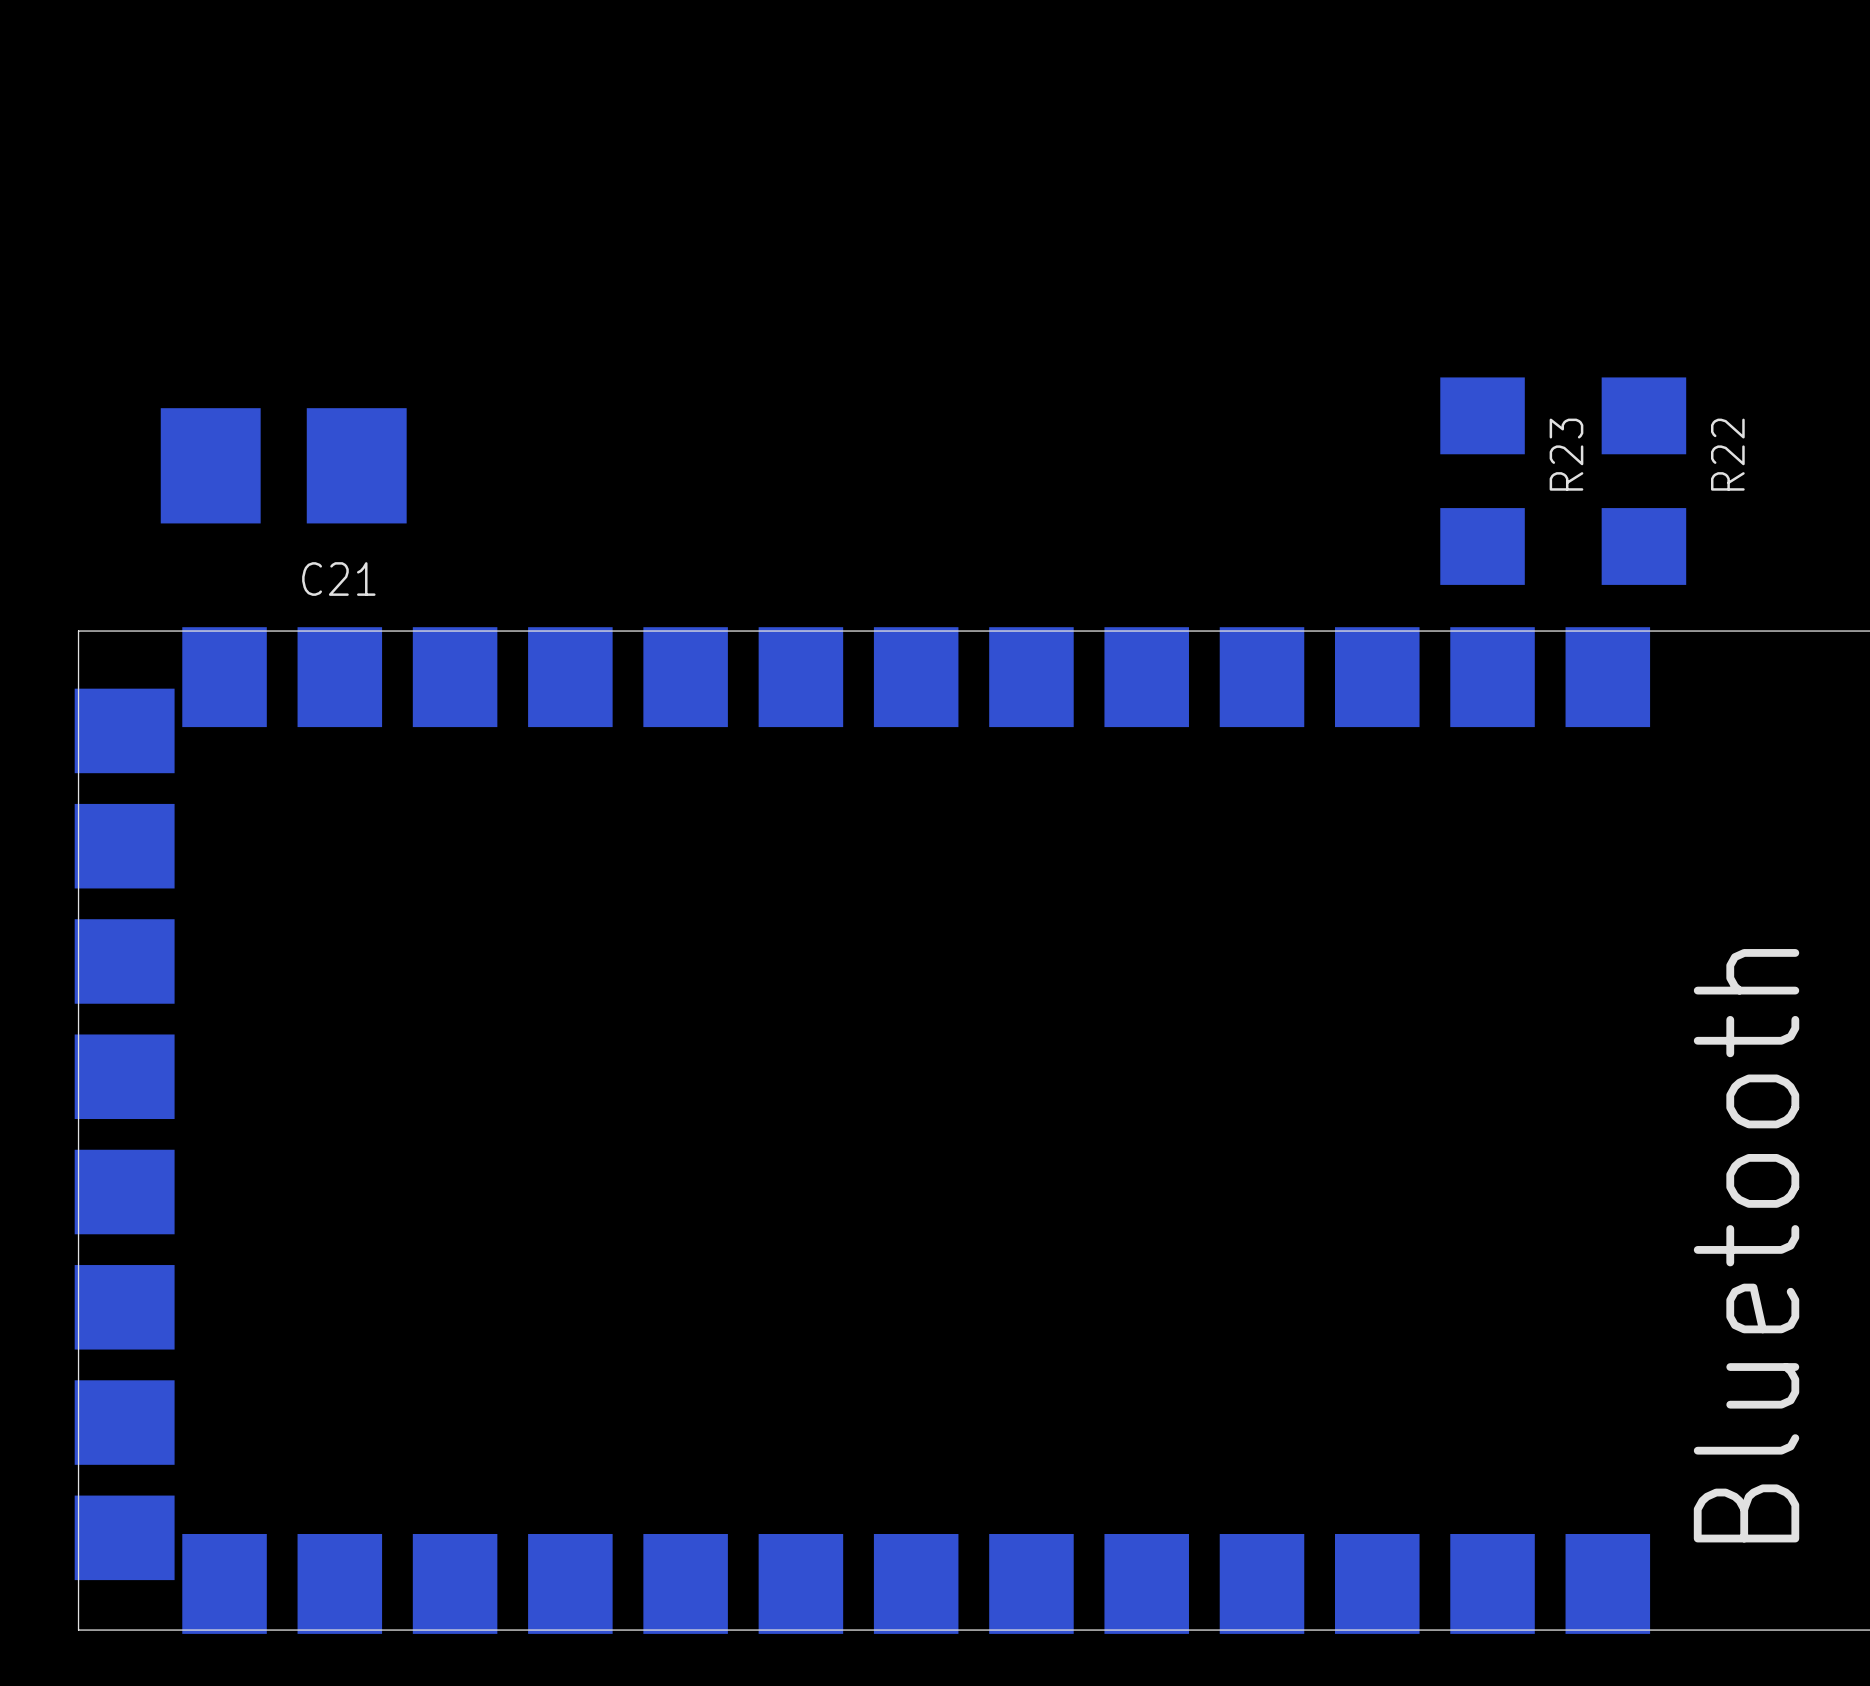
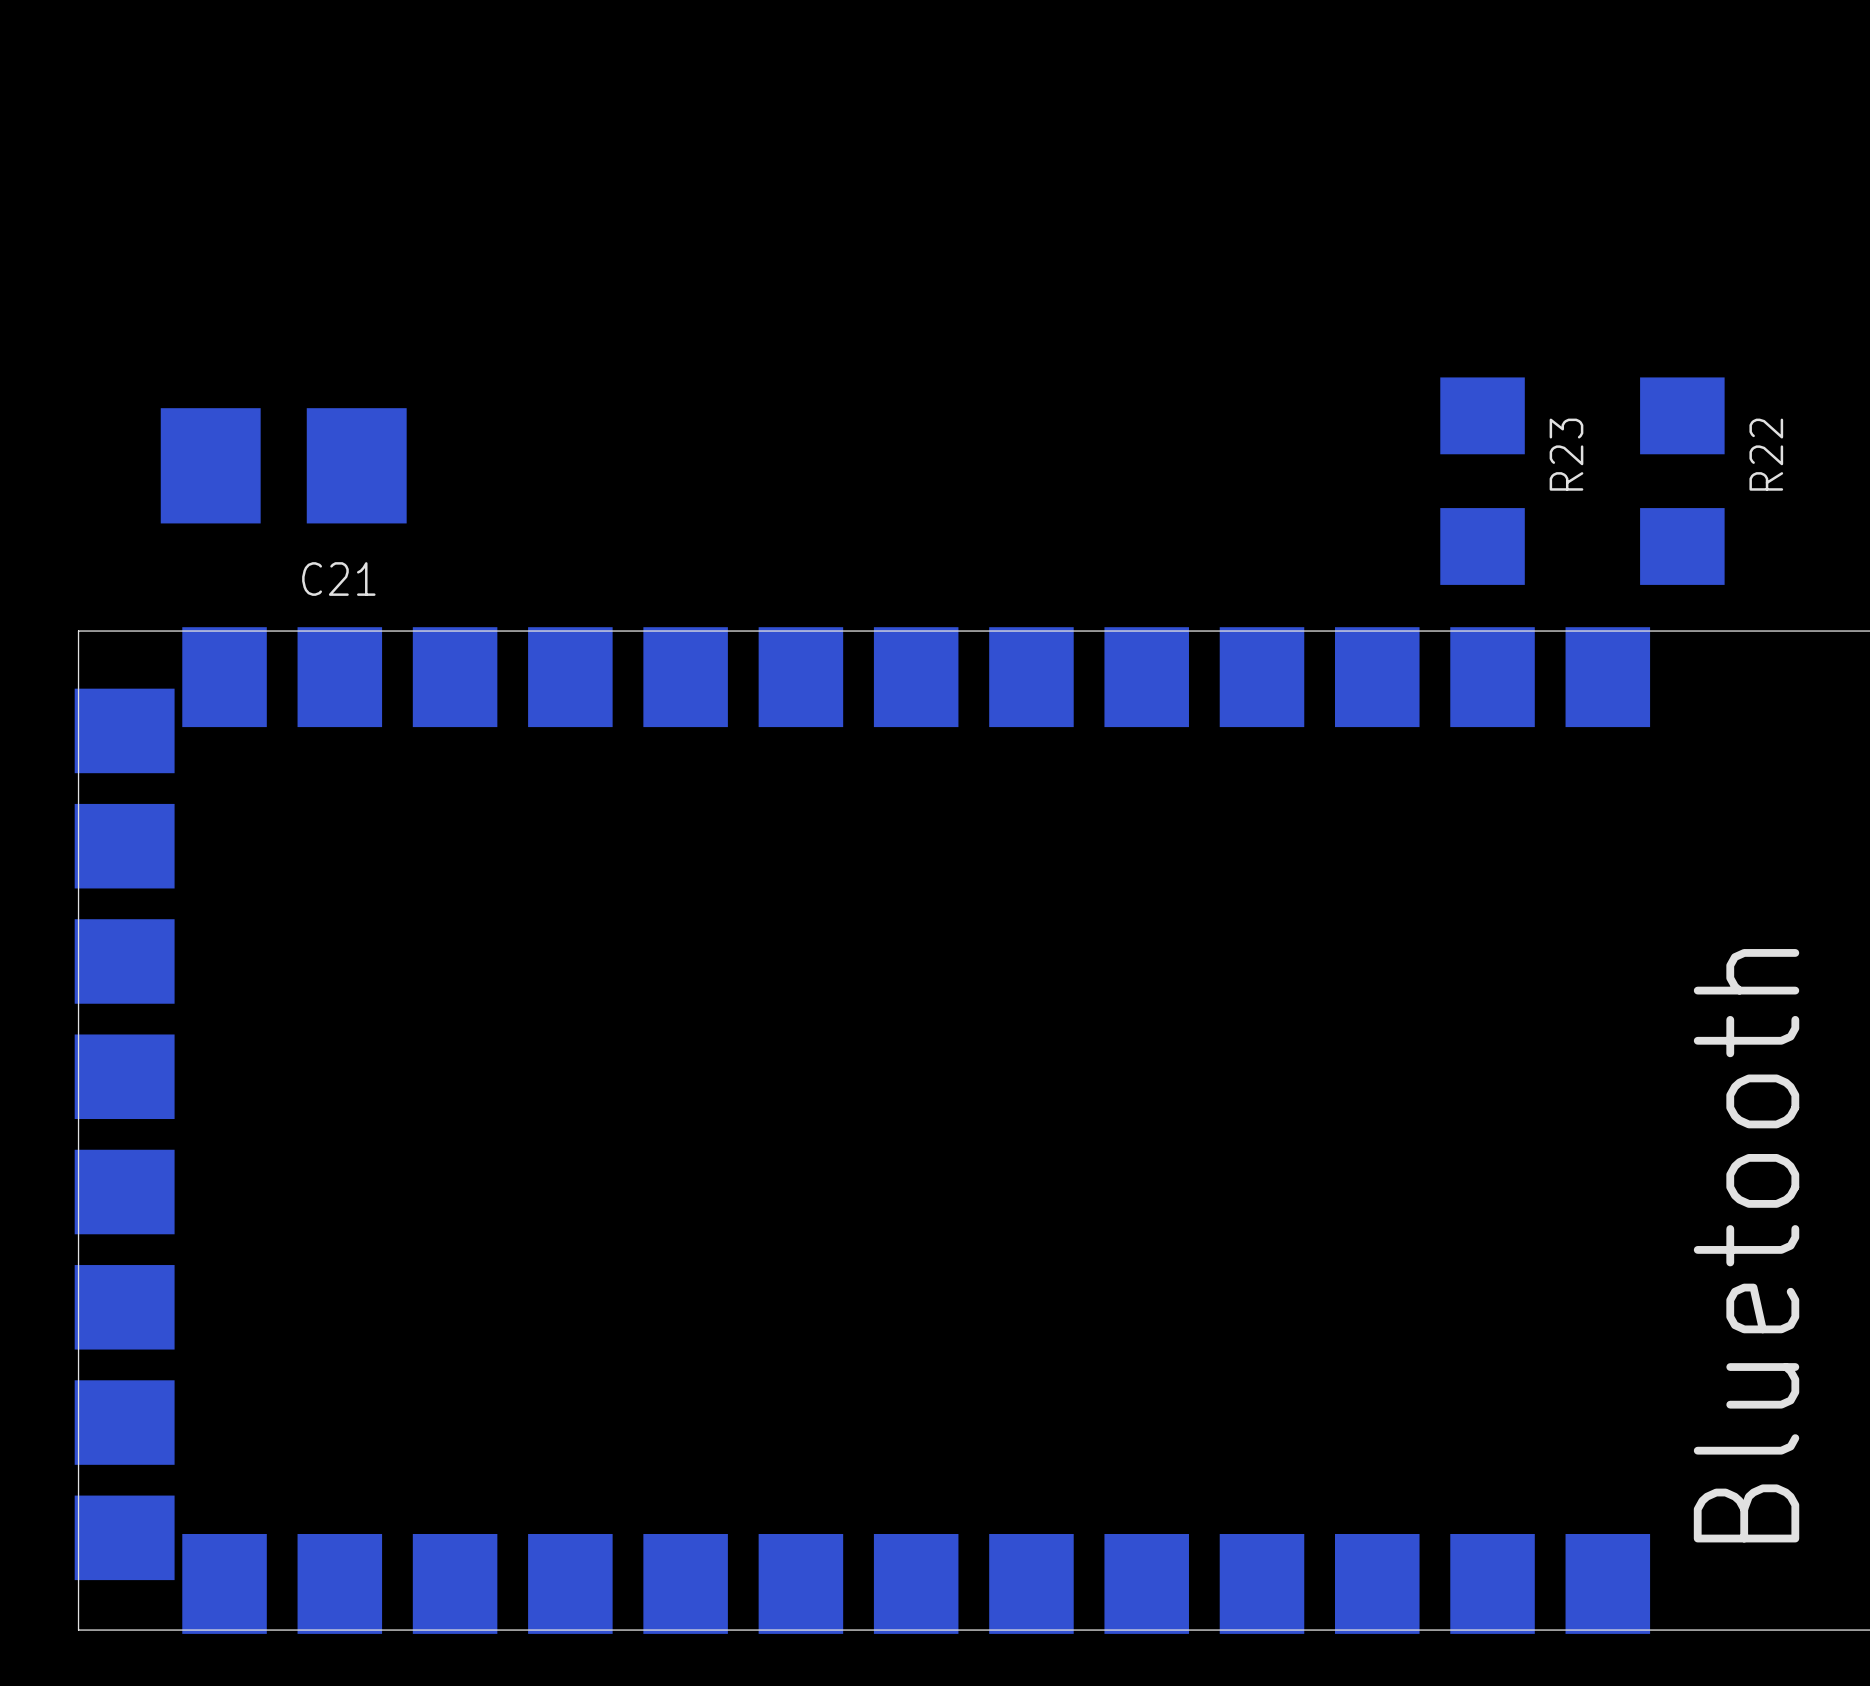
R22 position: (1643, 481) -> (1682, 481)

